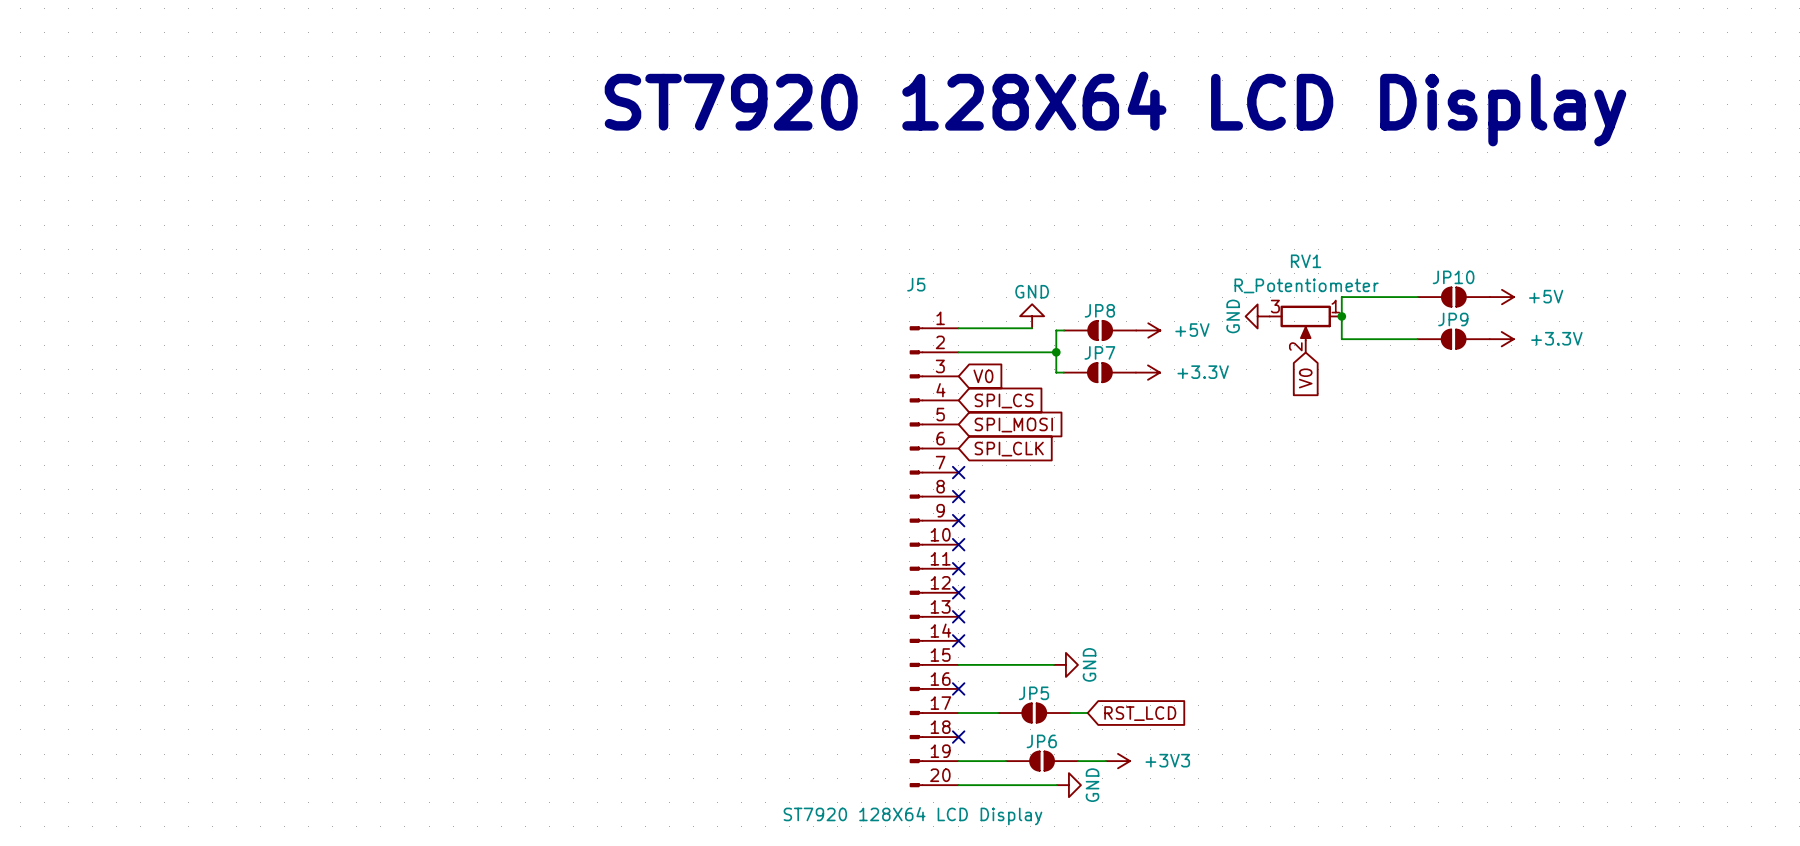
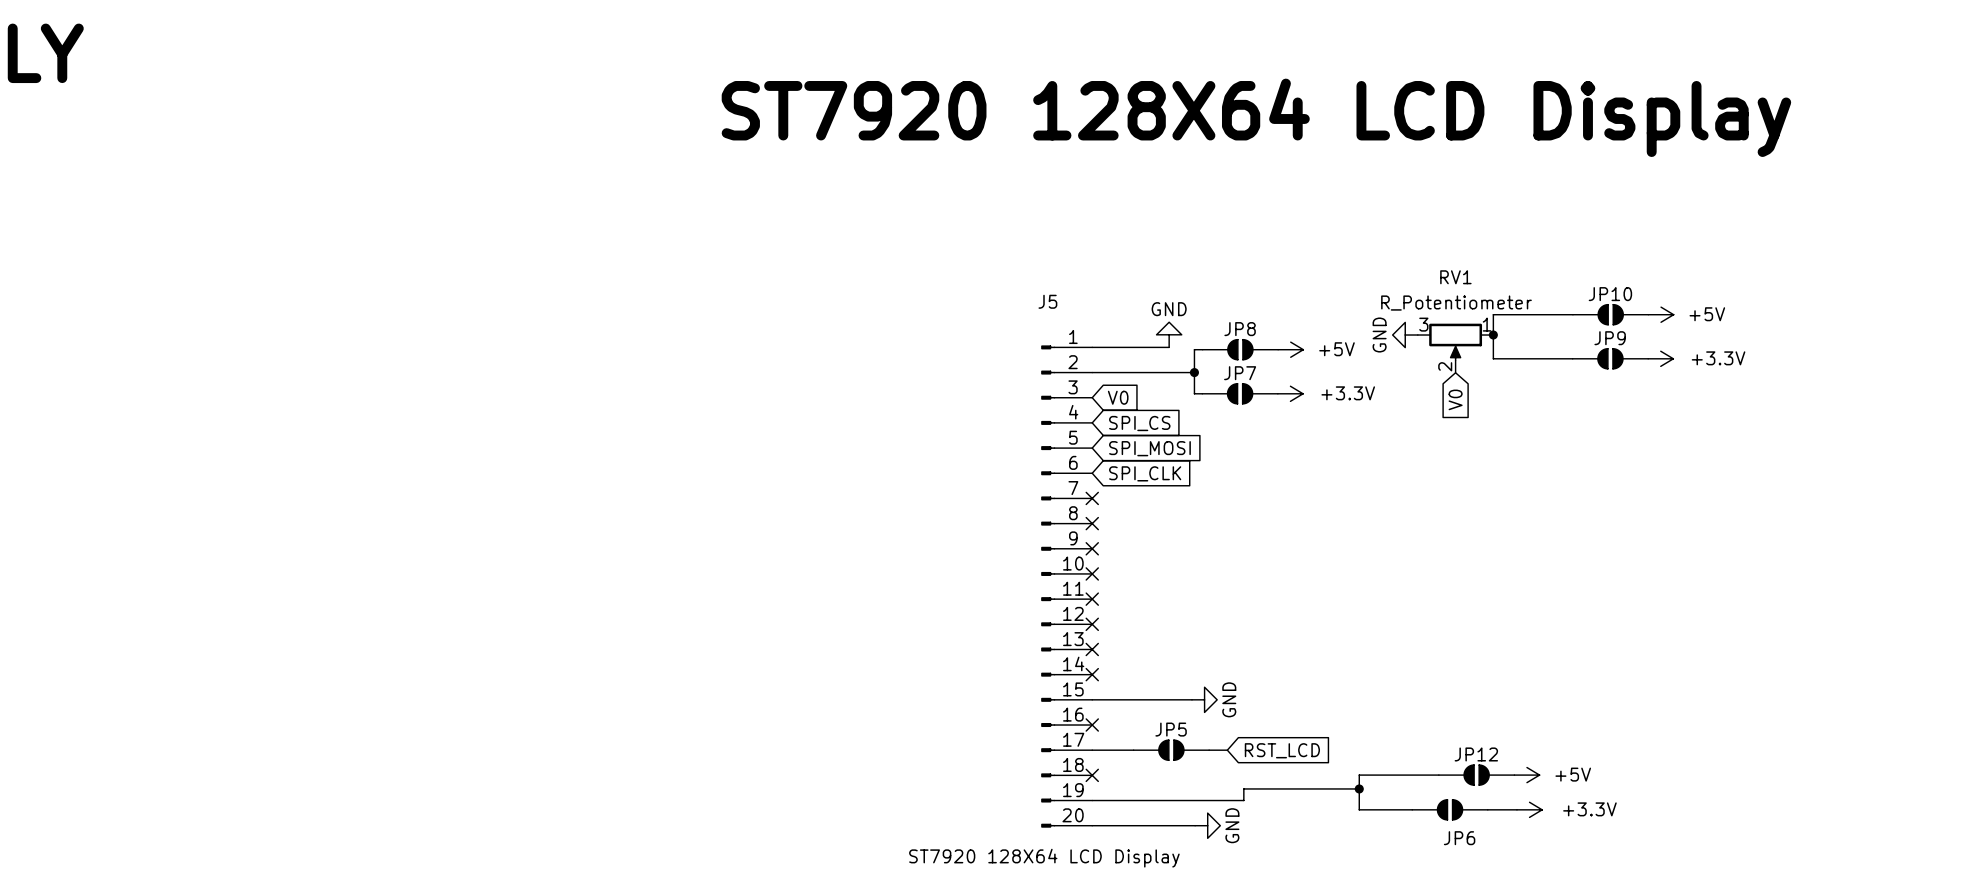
wire: none -> (1438, 775) (1359, 775) (1359, 809) (1412, 809)
JP12: none -> (1476, 775)
power symbol: none -> +5V (1526, 775)
JP6 name position: JP6 (1041, 741) -> JP6 (1459, 838)
junction: none -> (1359, 788)
JP6 position: (1042, 761) -> (1450, 809)
wire: (1103, 761) (1106, 761) -> (1243, 800) (1243, 788) (1359, 788)
power symbol: +3V3 (1118, 761) -> none
wire: none -> (1487, 809) (1516, 809)
power symbol: none -> +3.3V (1529, 809)

